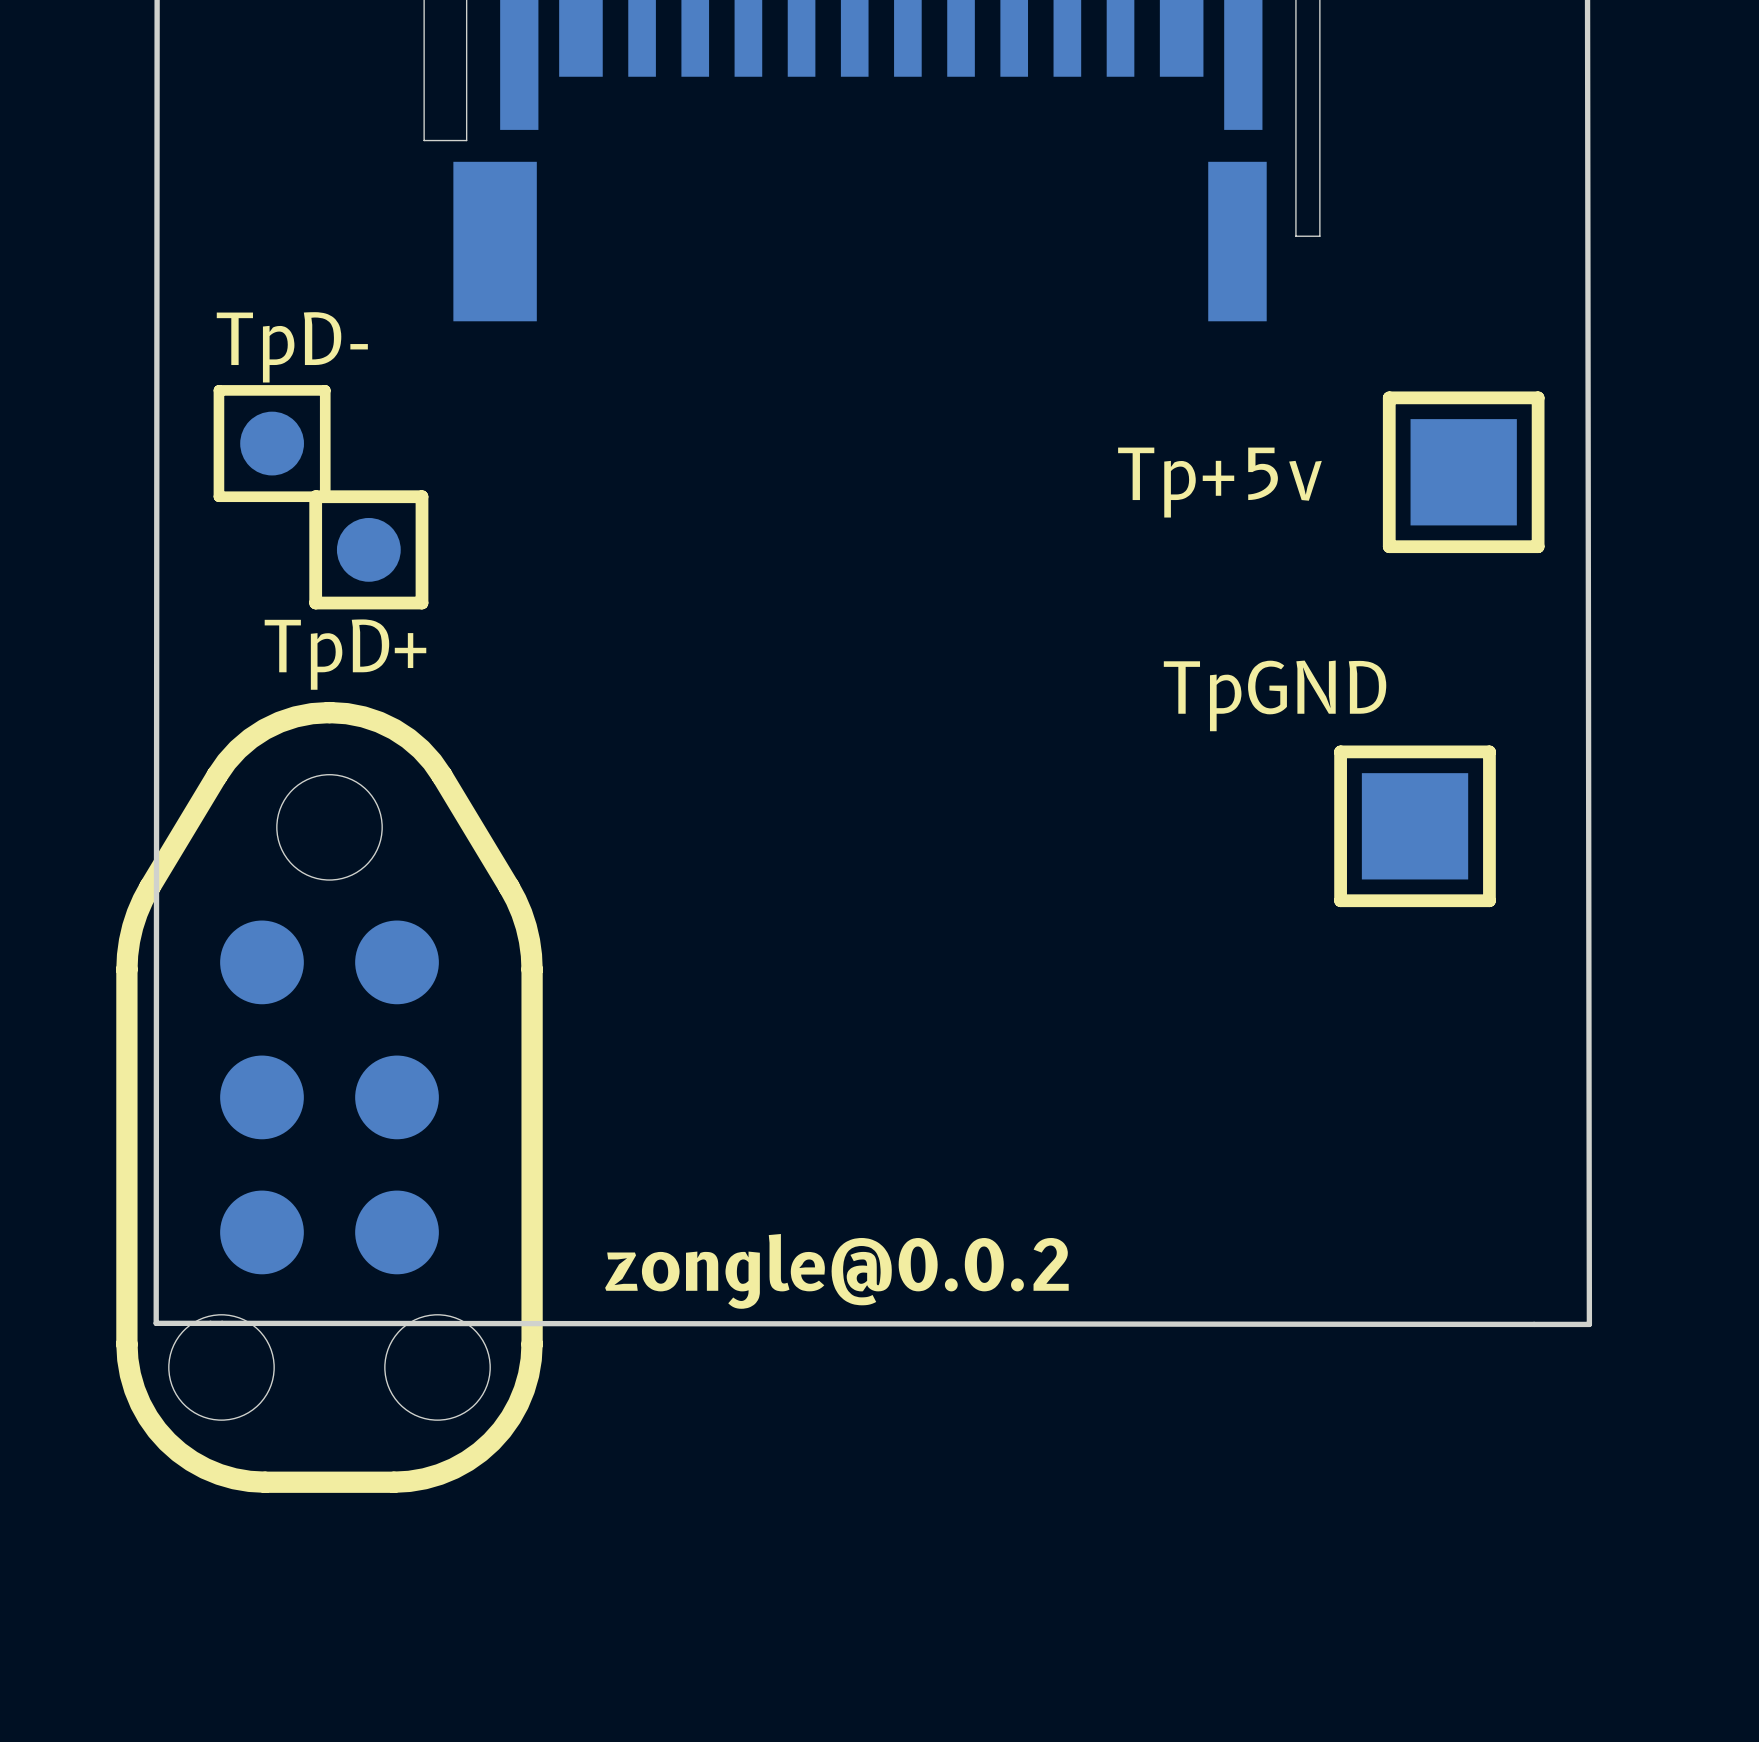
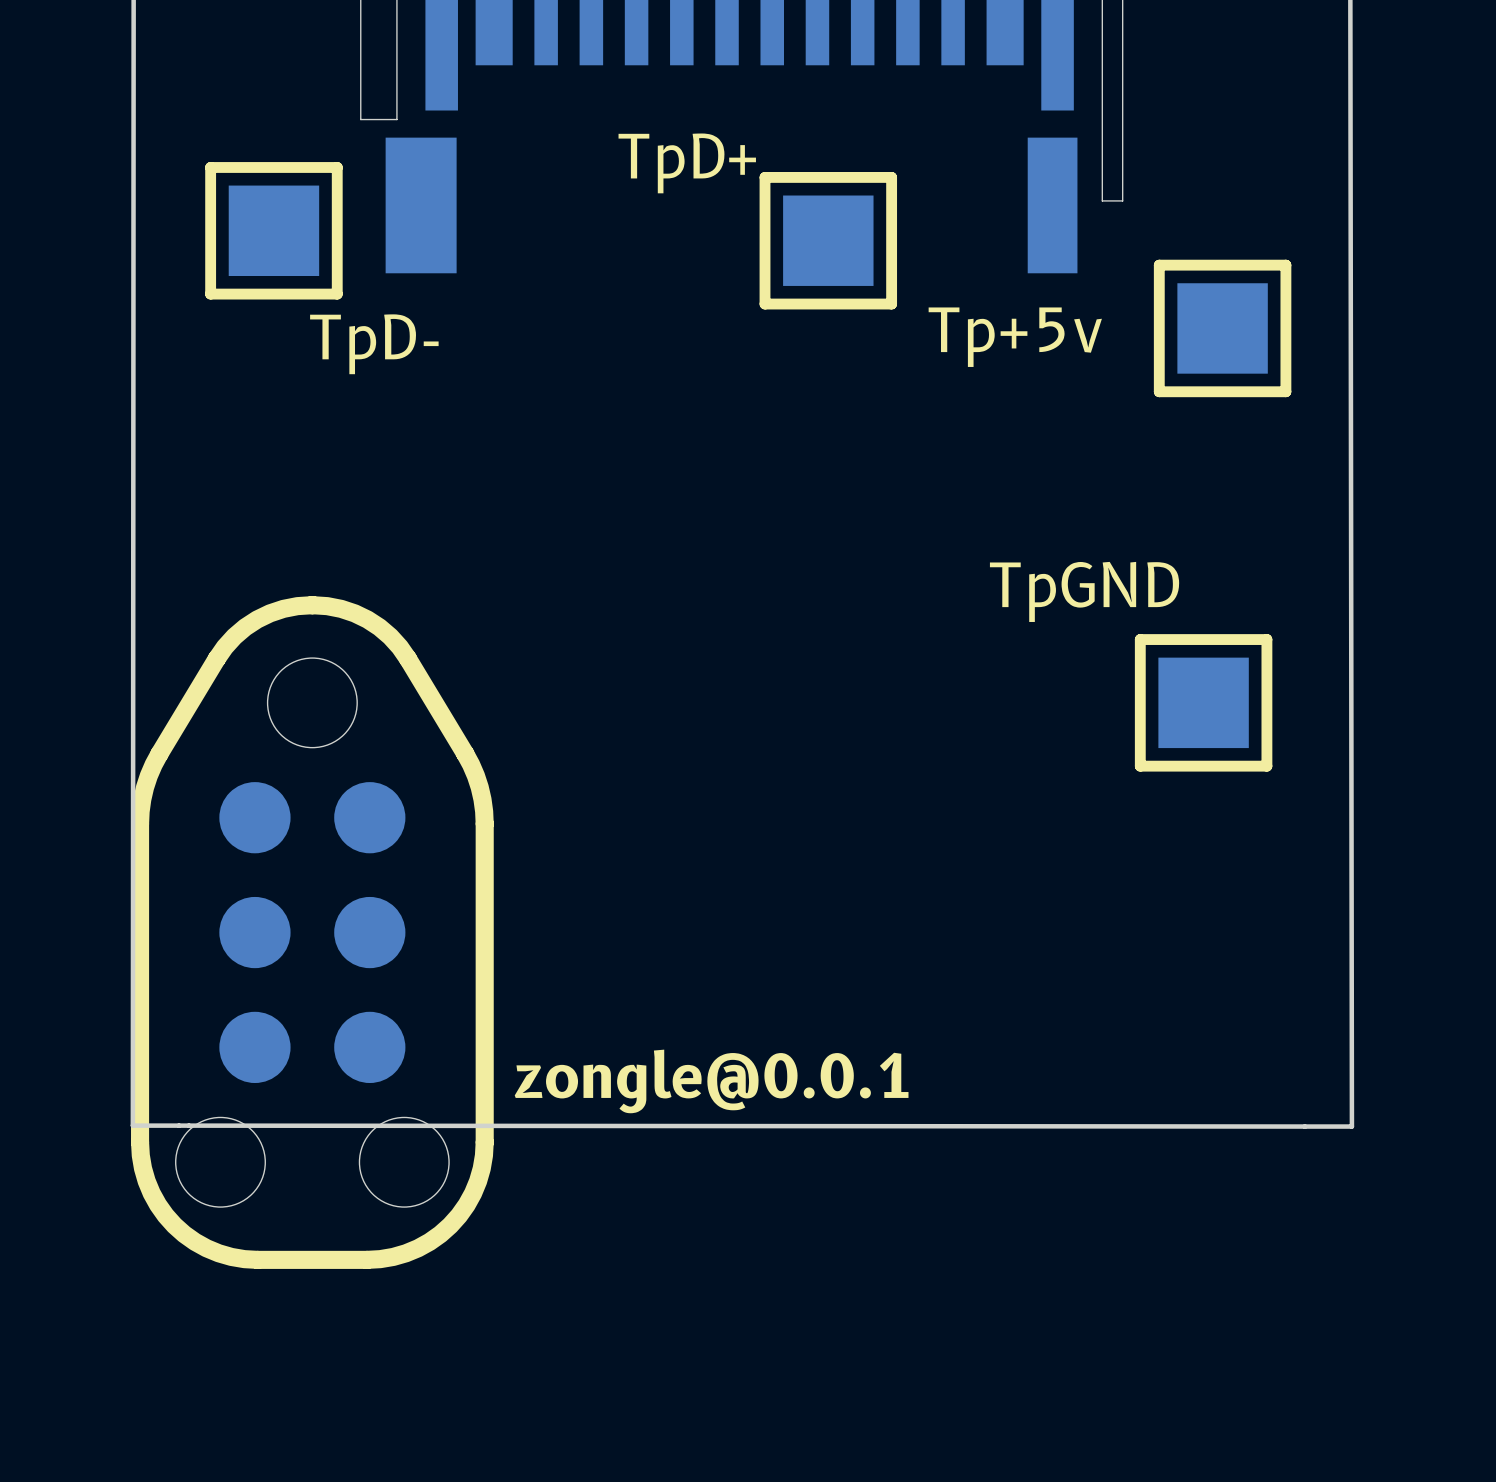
TpD-: none -> (273, 230)
TpD+: none -> (828, 240)
TpD-: (272, 443) -> none
Tp+5v position: (1463, 472) -> (1222, 328)
TpD+: (368, 549) -> none
part position: (329, 1097) -> (312, 932)
text: zongle@0.0.2 (836, 1271) -> zongle@0.0.1 (711, 1081)

